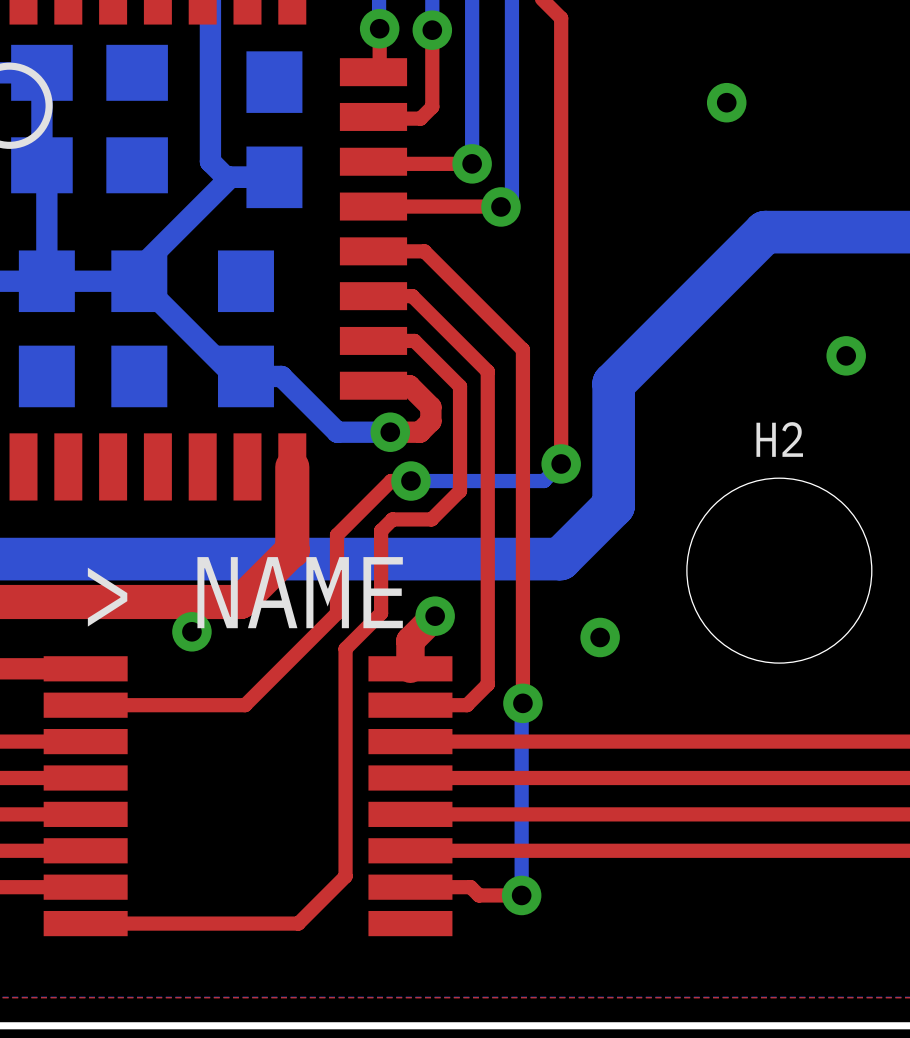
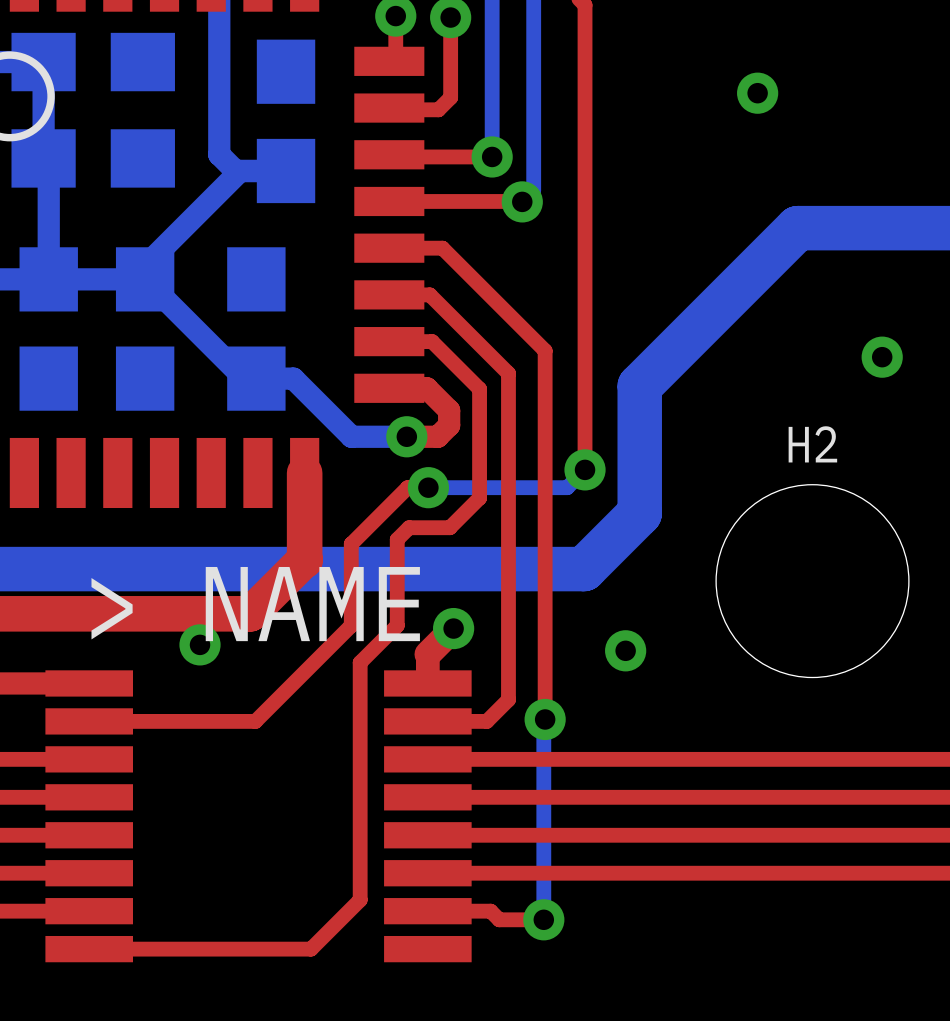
top track width: thick (435, 616) (410, 640) (410, 668) -> thin (453, 628) (427, 654) (427, 683)

